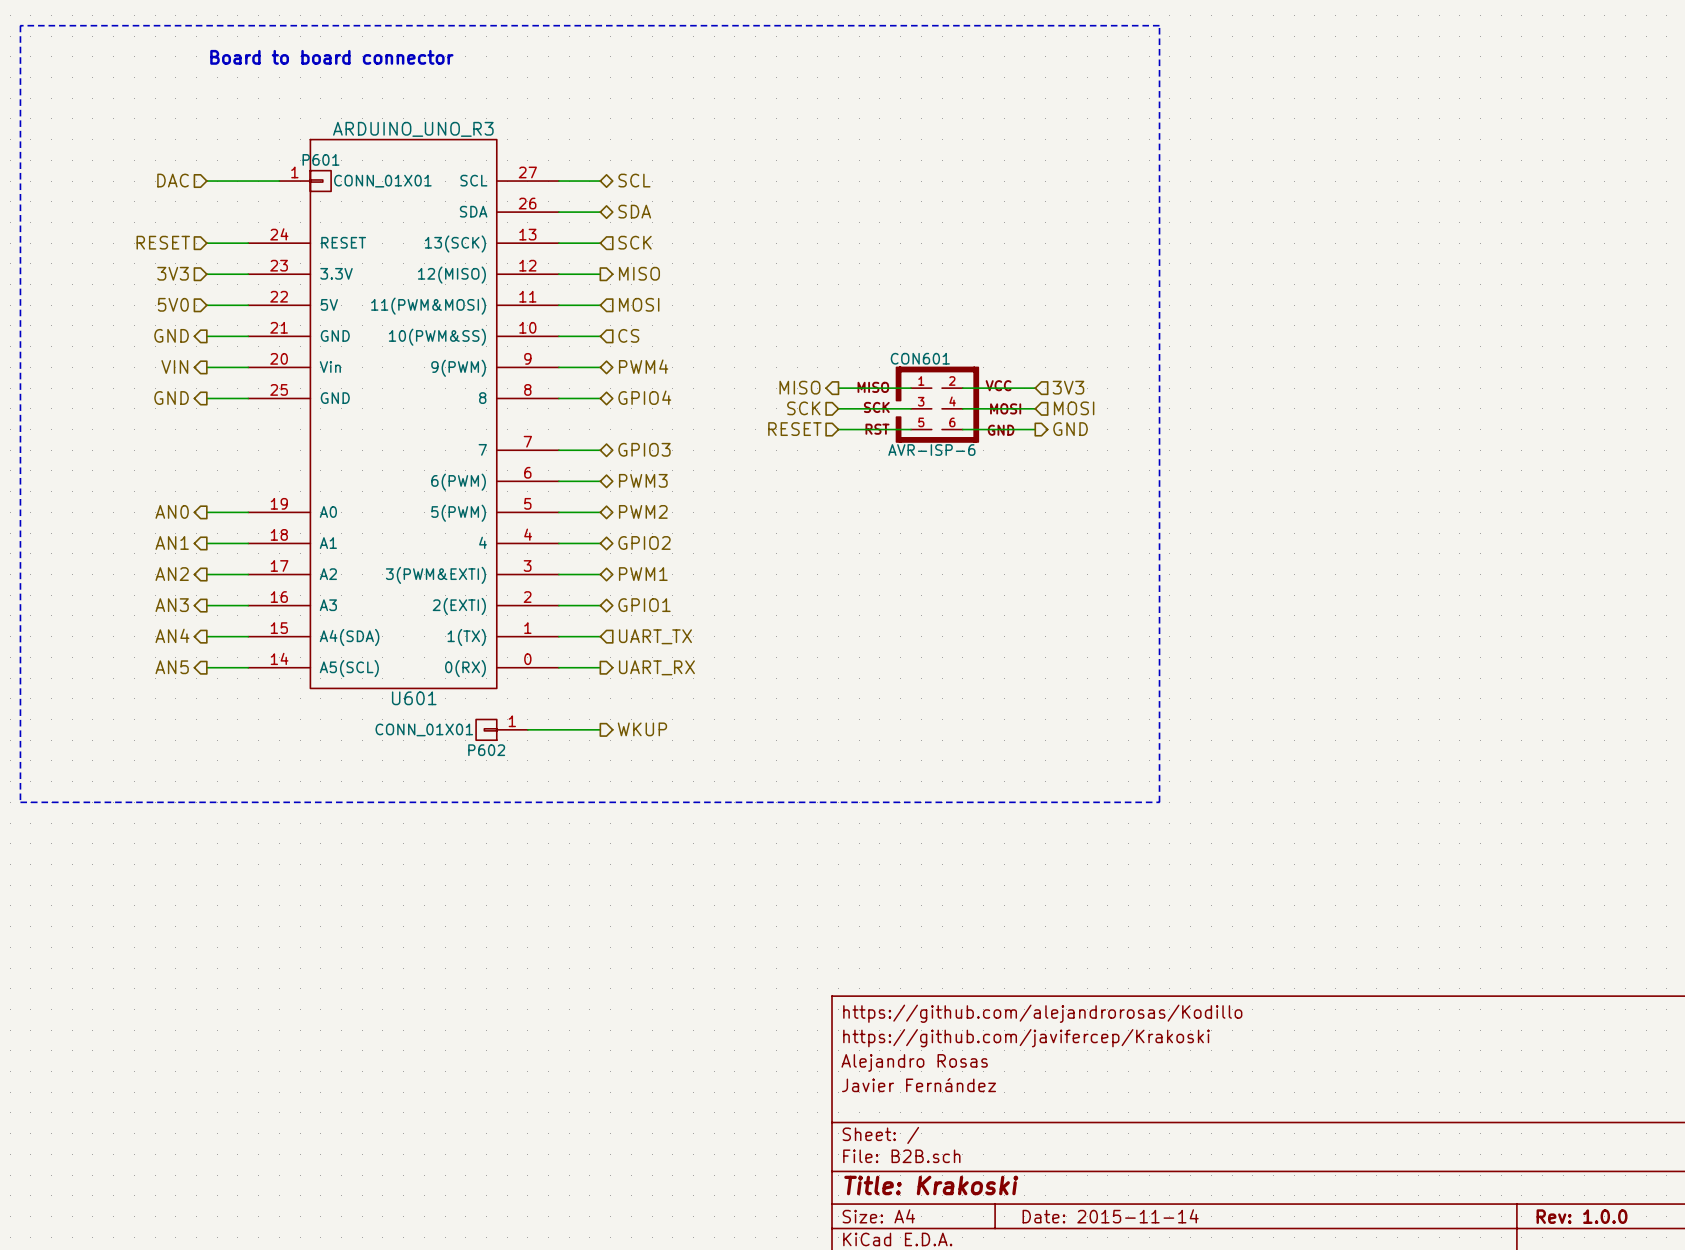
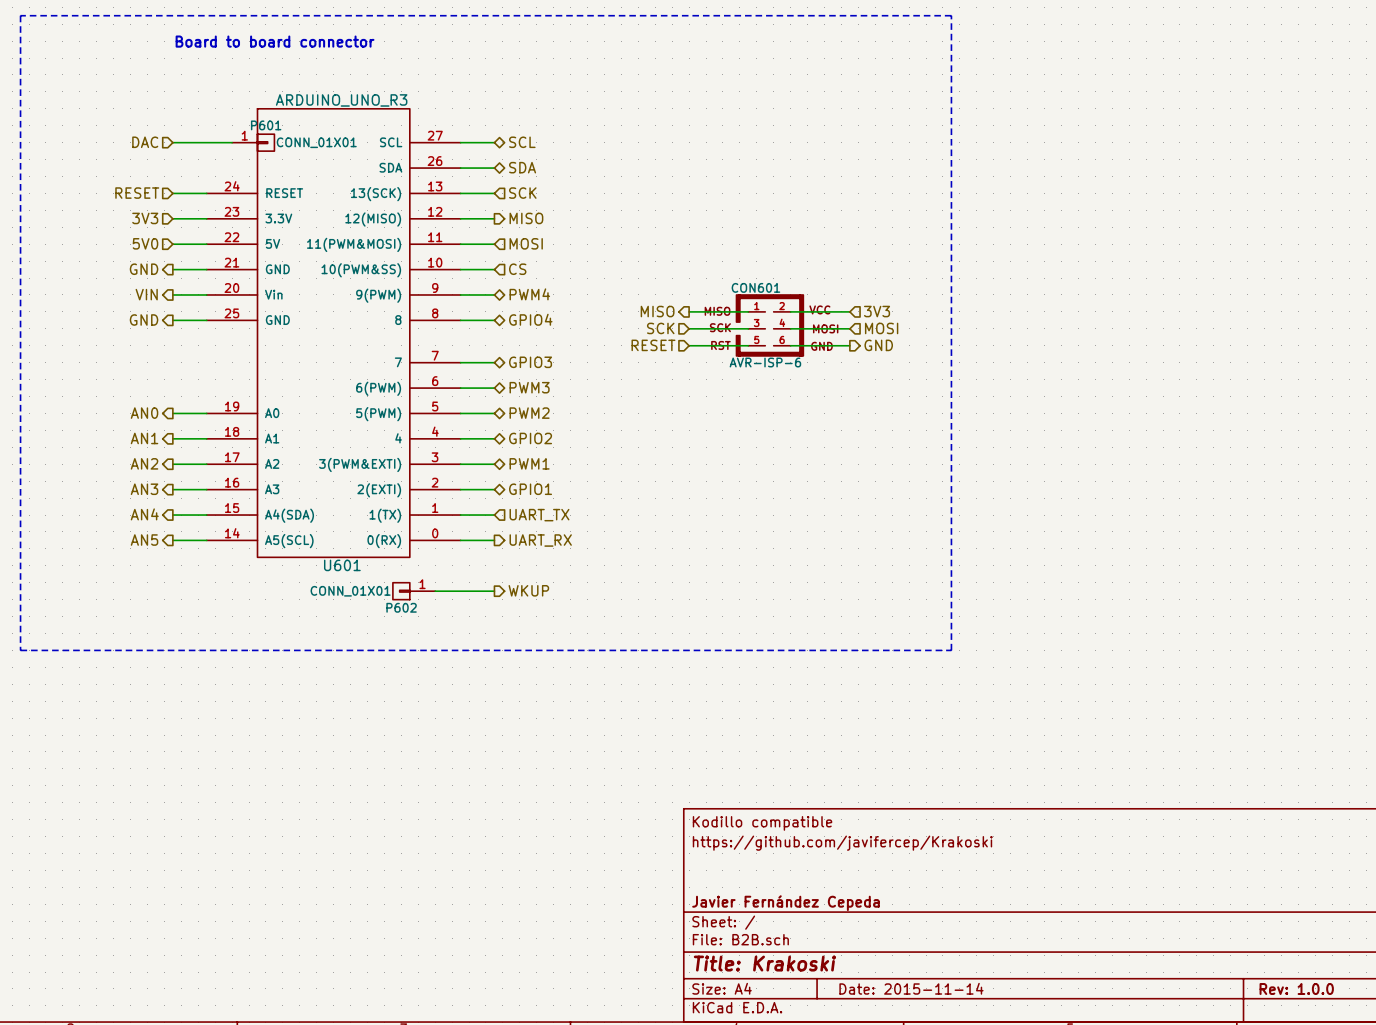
title block: https://github.com/alejandrorosas/Kodillo (1042, 1013) -> Kodillo compatible (762, 823)
title block: Alejandro Rosas (914, 1062) -> none
title block: Javier Fernández (919, 1085) -> Javier Fernández Cepeda (786, 903)

